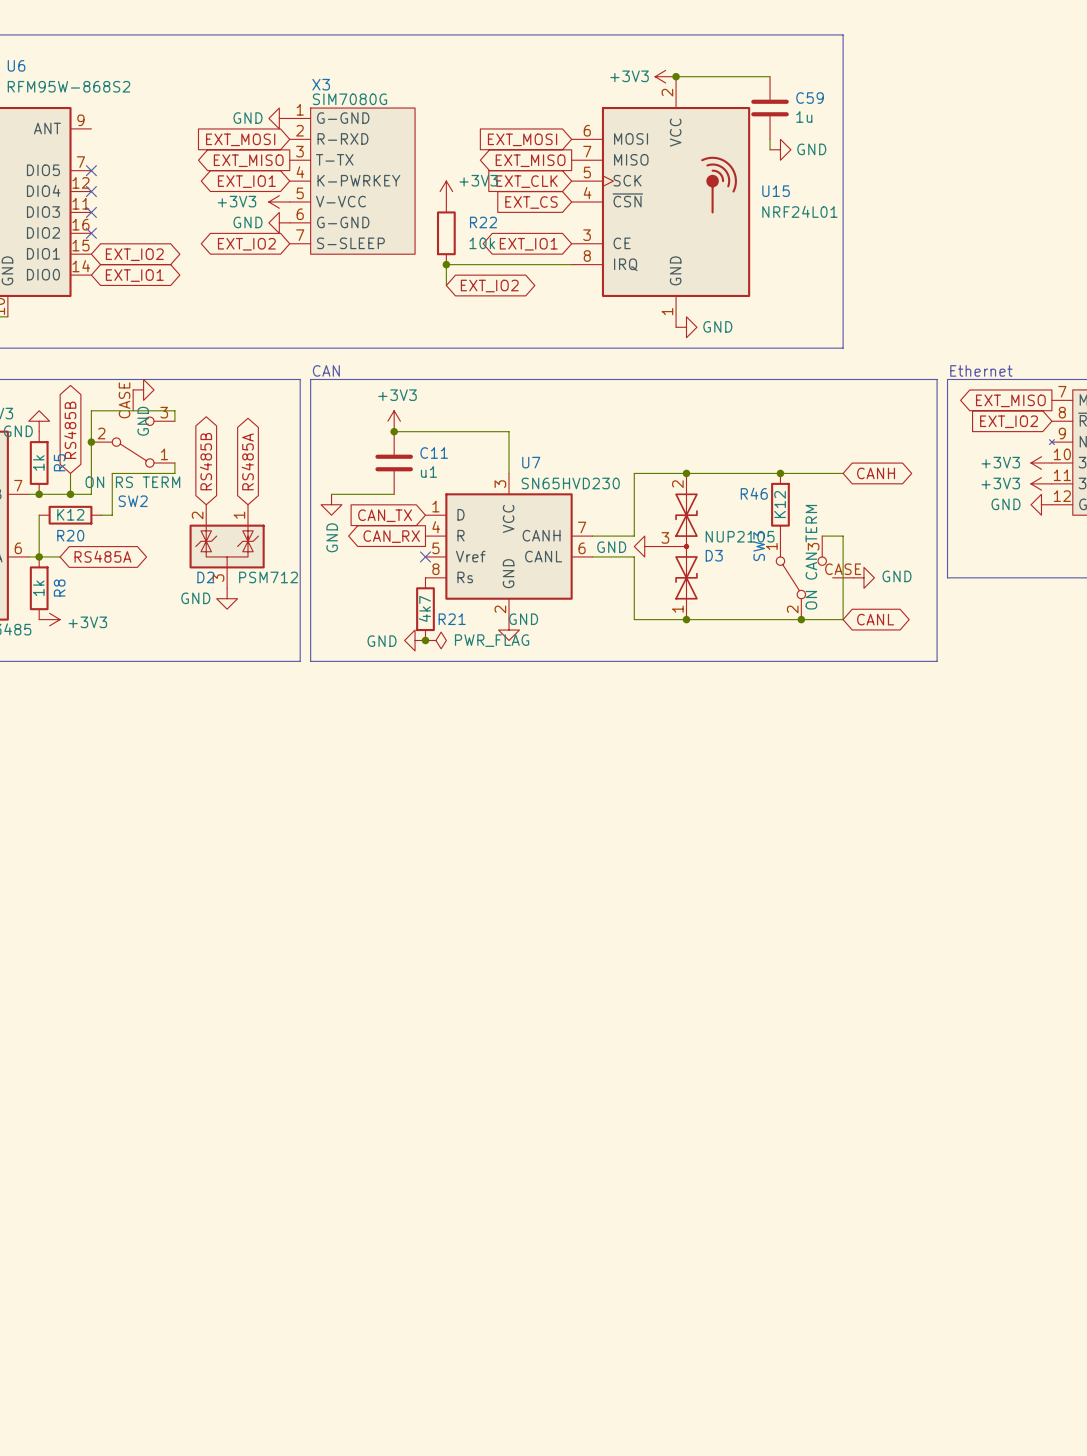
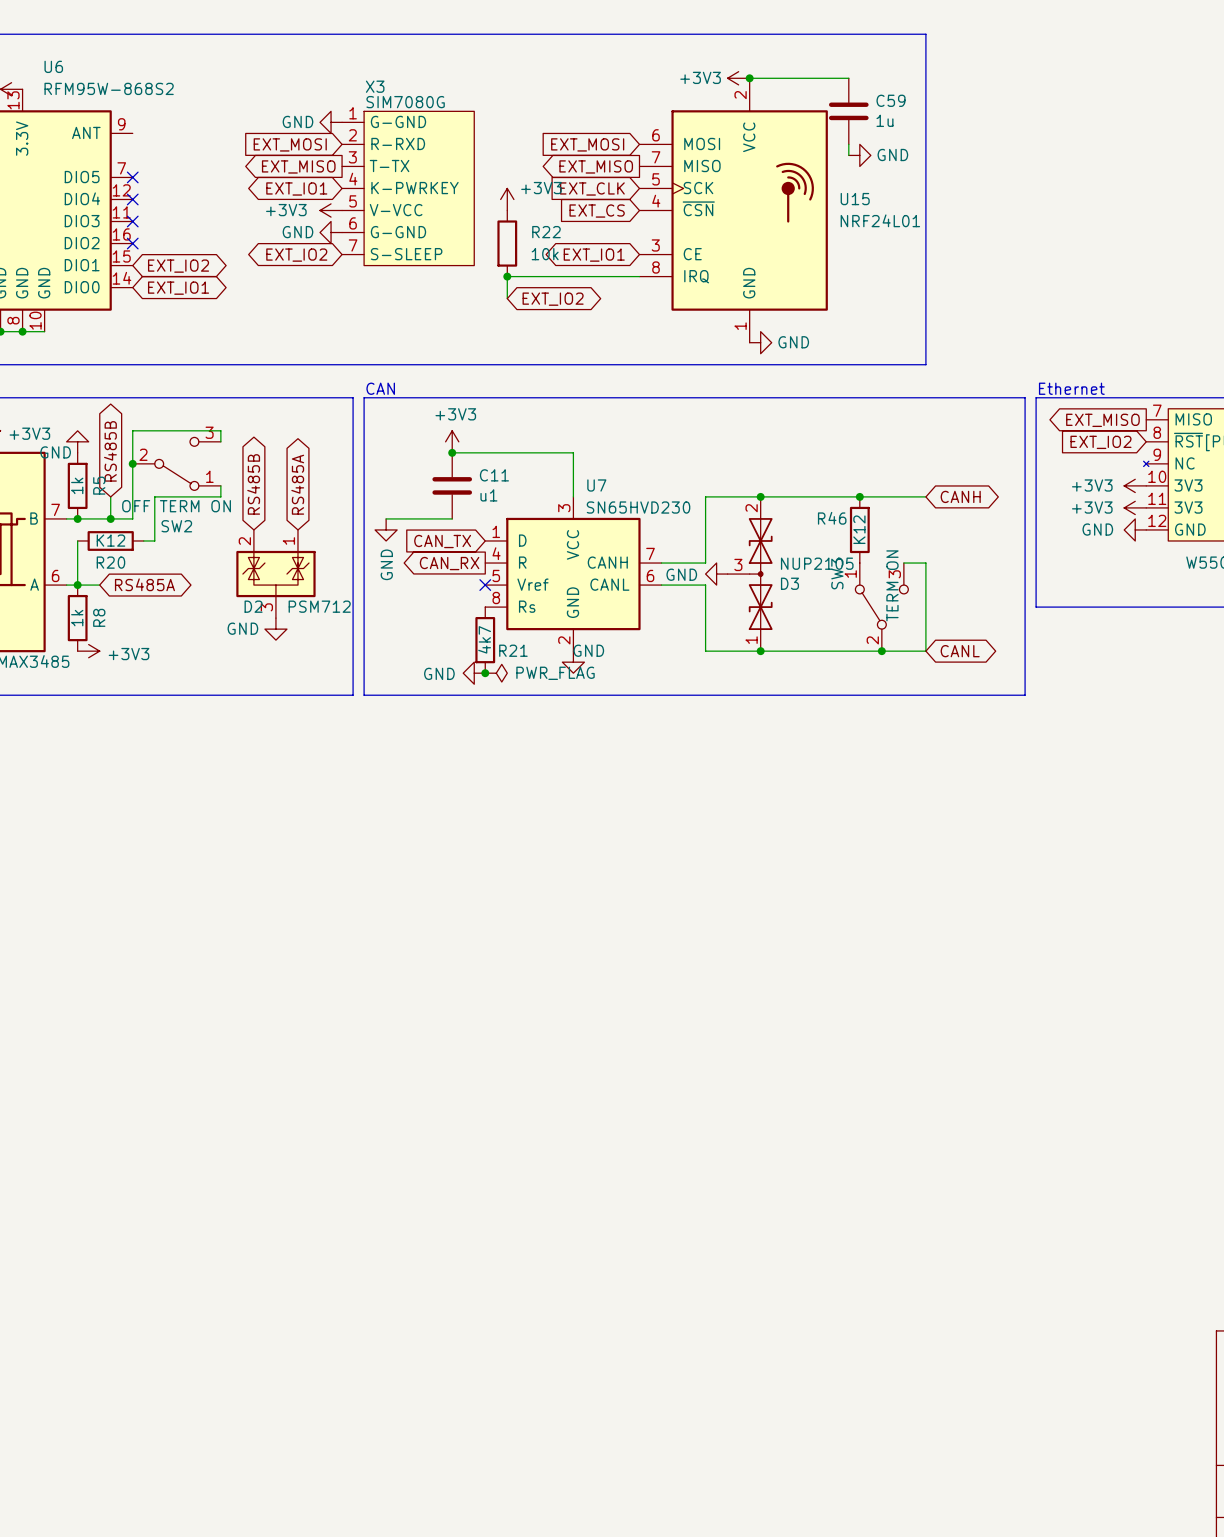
SW2 symbol: [91, 389, 175, 468] -> [132, 437, 221, 491]
power symbol: GND (143, 389) -> none
SW2 value: ON RS TERM (132, 482) -> OFF TERM ON (176, 506)
SW3 symbol: [776, 536, 854, 620] -> [855, 563, 909, 652]
SW3 value: ON CAN TERM (811, 557) -> TERM ON (892, 585)
power symbol: GND (863, 577) -> none

